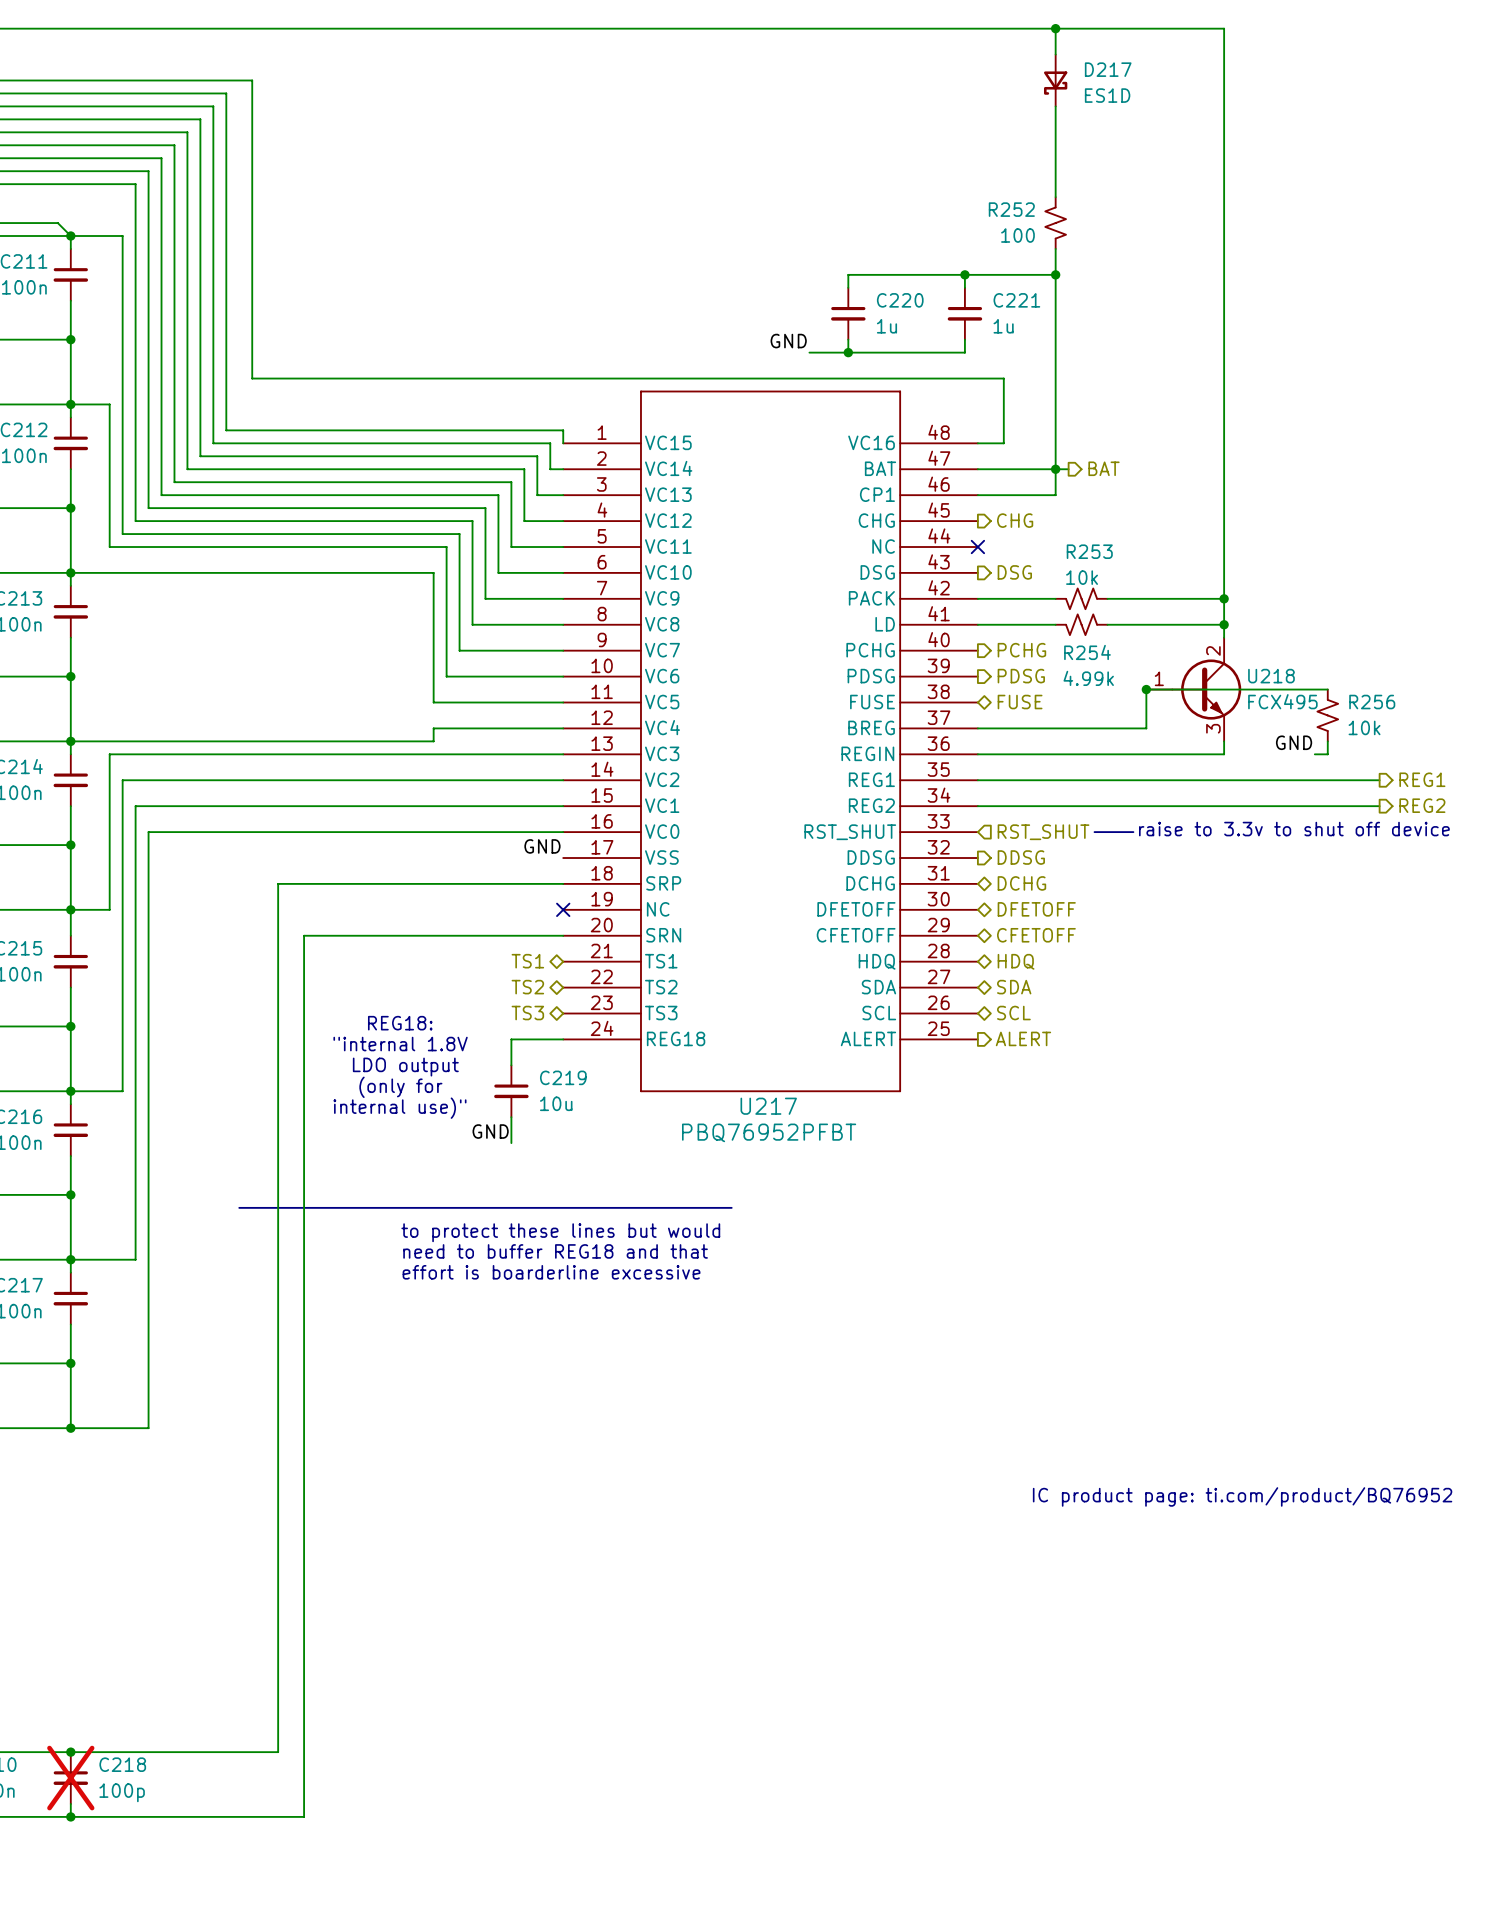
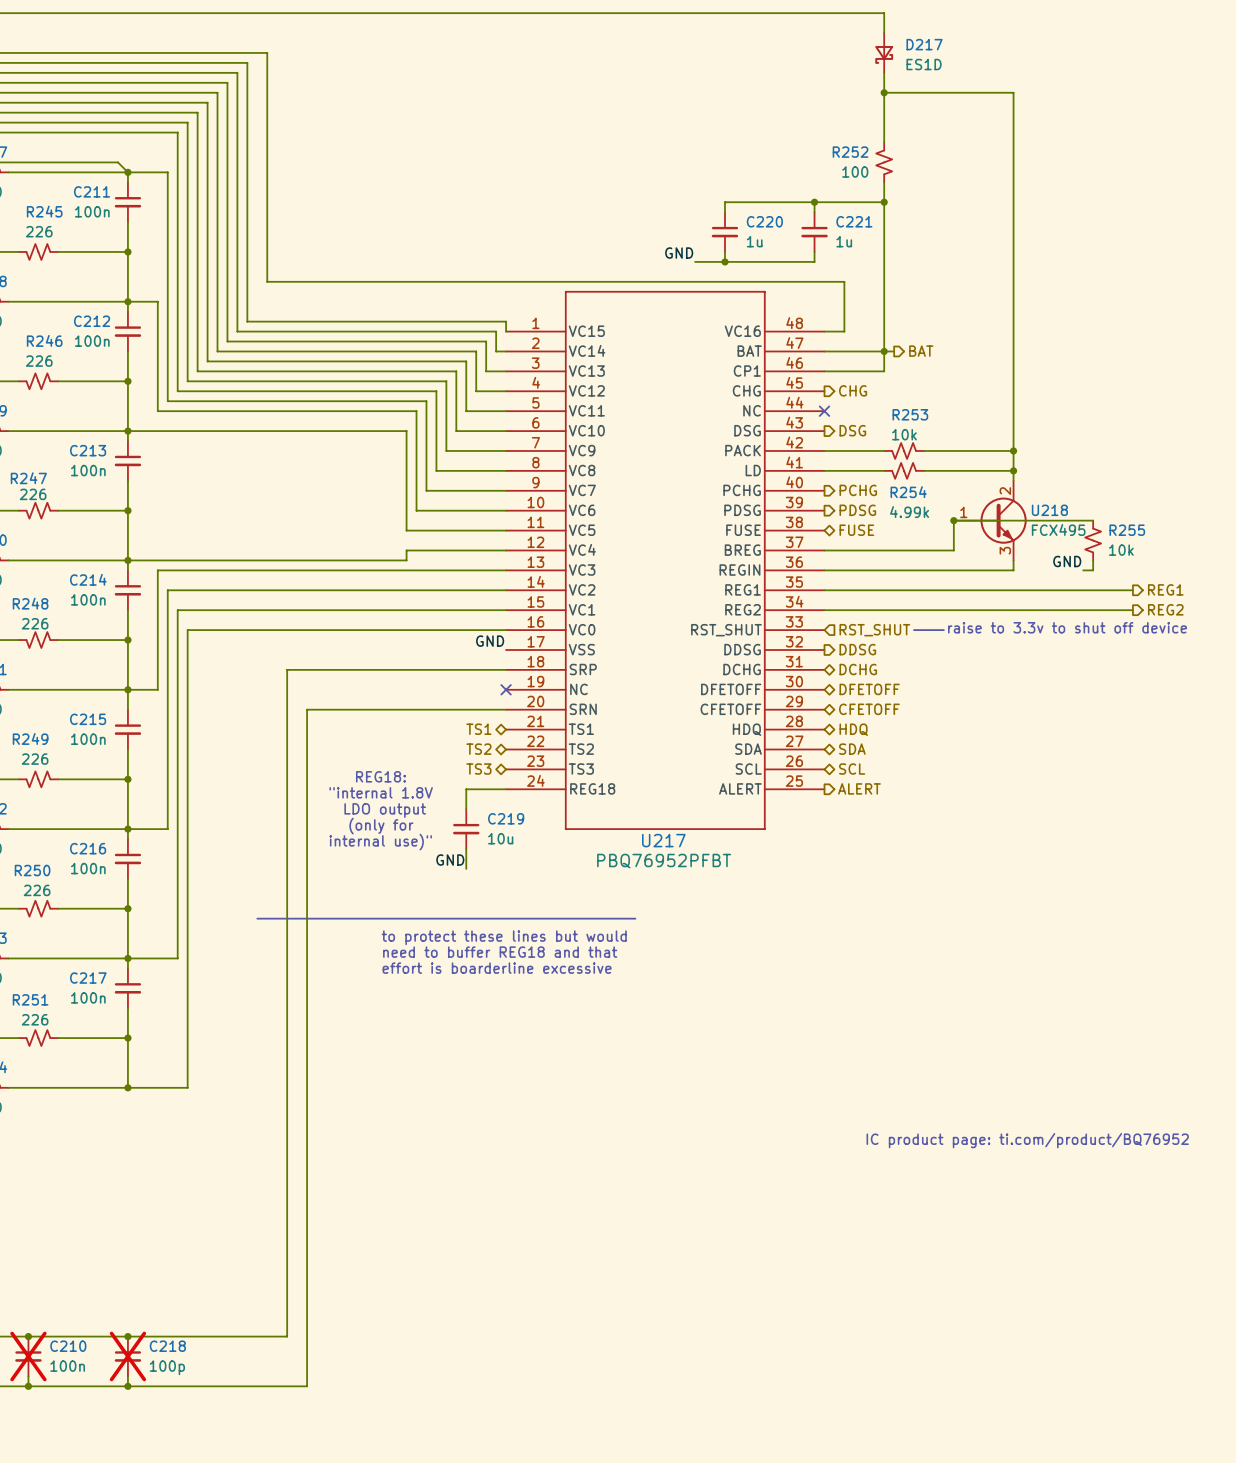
wire: (1055, 28) (1224, 28) (1224, 132) -> (884, 92) (1013, 92)
junction: (1055, 28) -> none
junction: none -> (884, 92)
R256 name: R256 (1372, 702) -> R255 (1127, 530)

